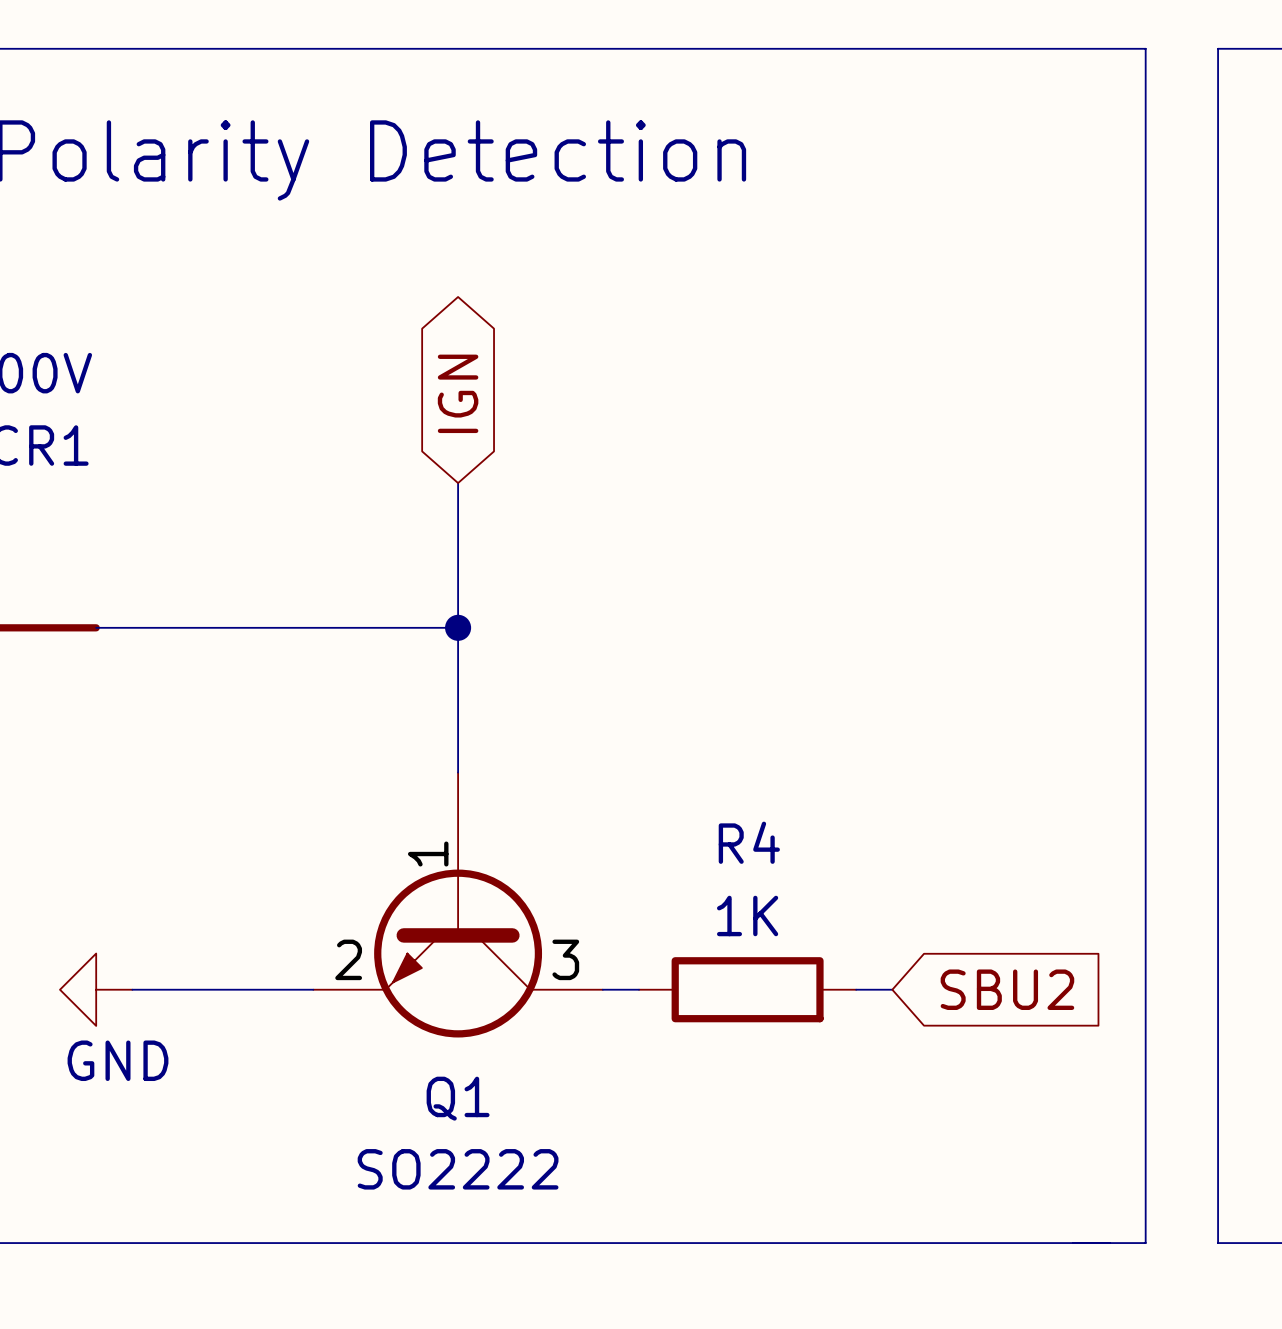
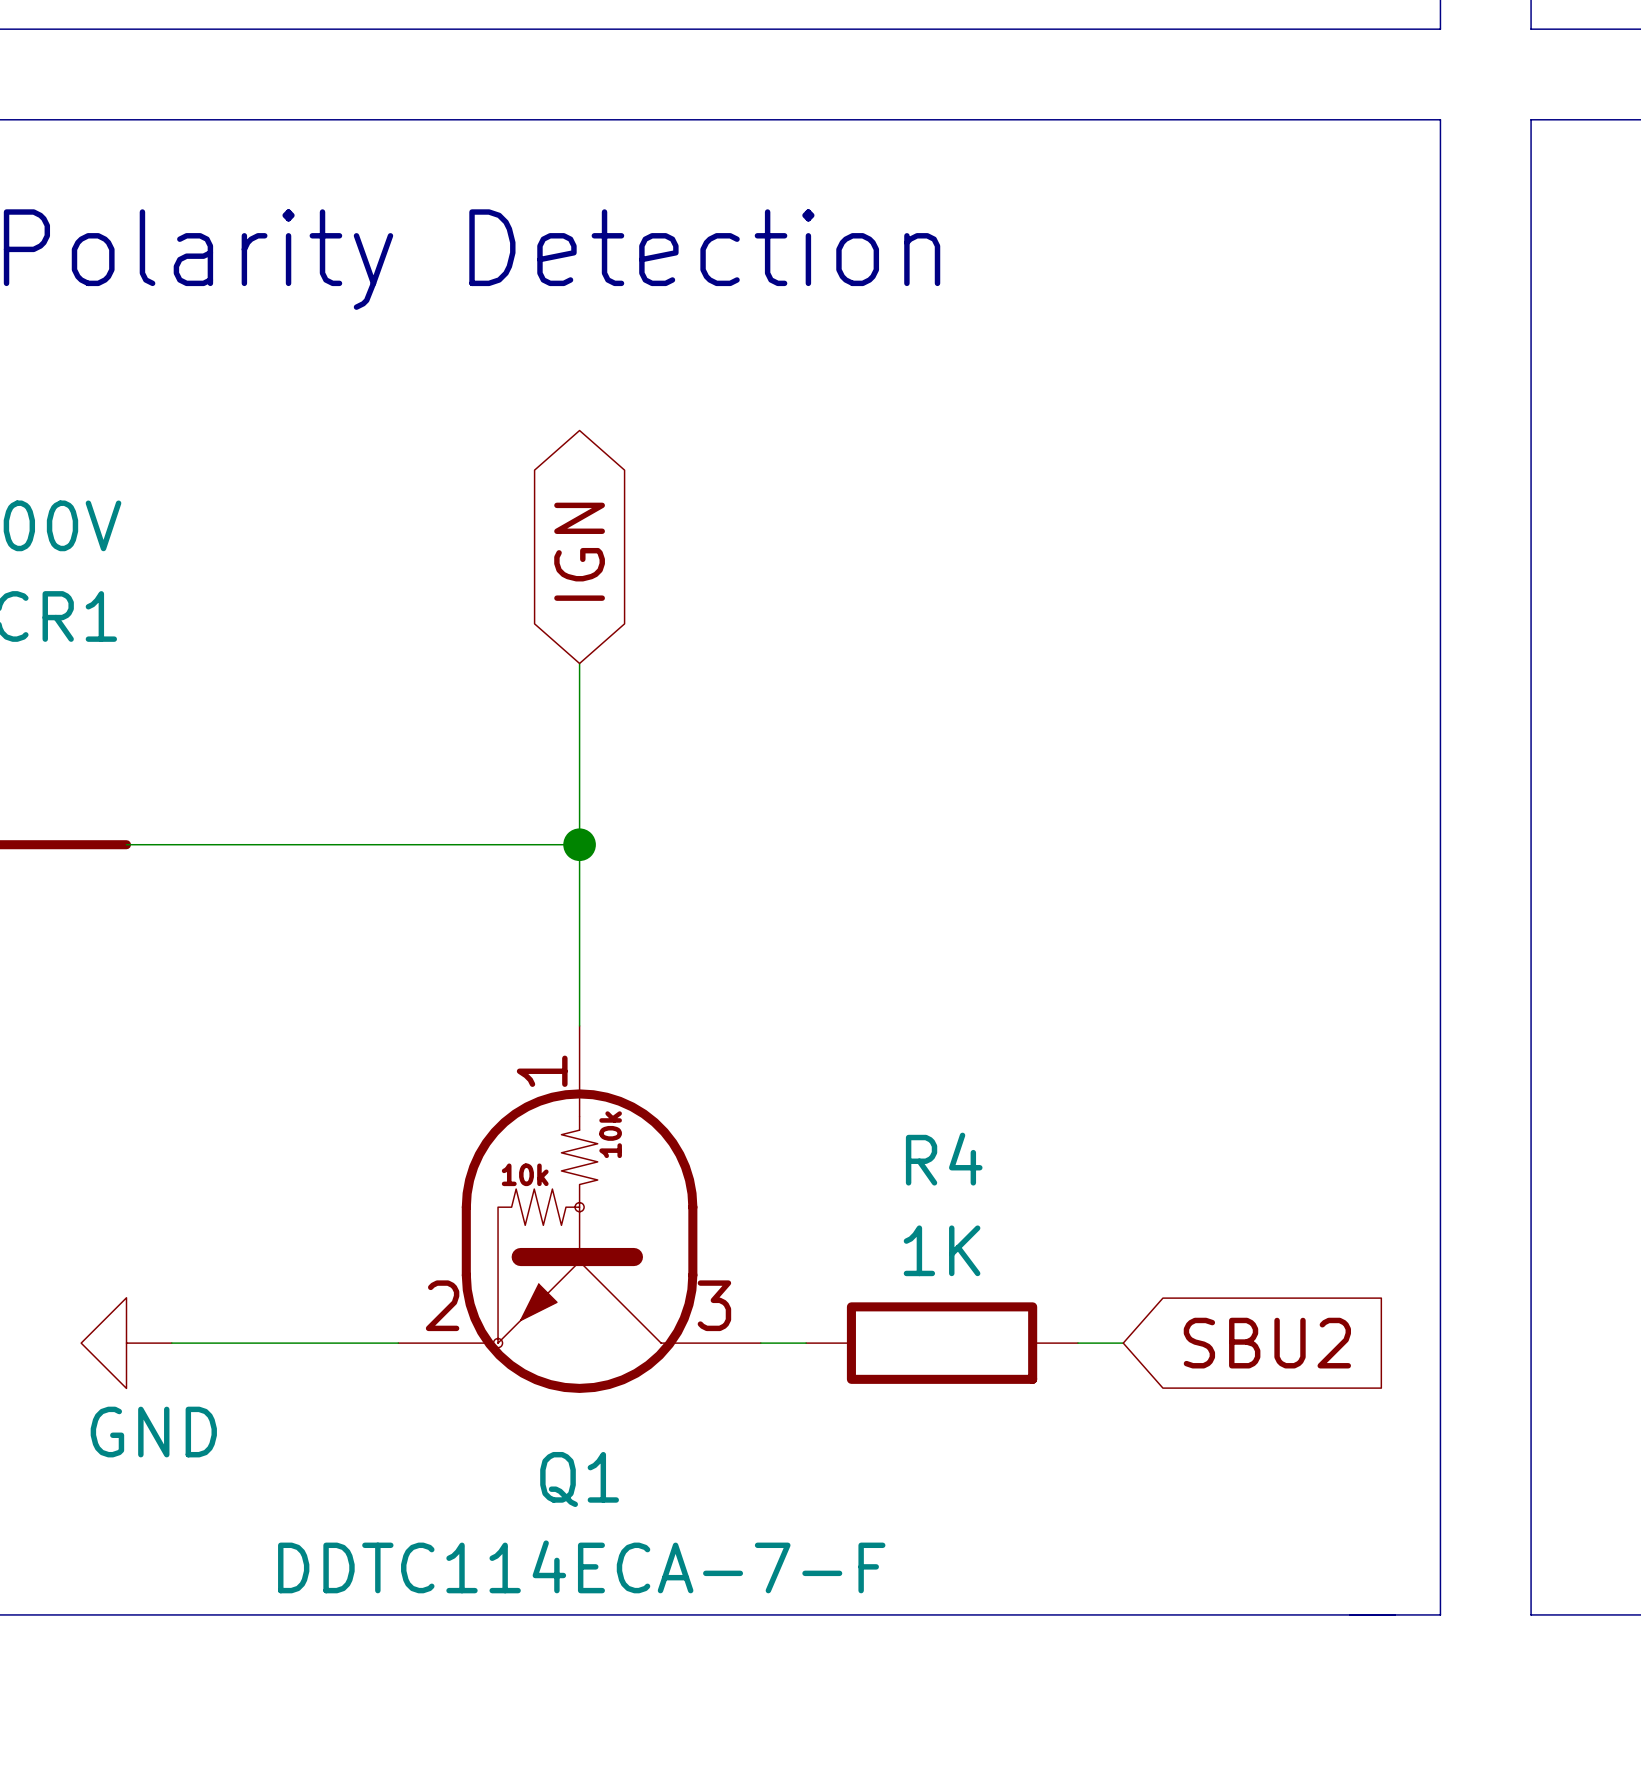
Q1 symbol: [313, 772, 603, 1038] -> [398, 1025, 761, 1393]
power symbol position: GND (96, 989) -> GND (126, 1343)
wire: (132, 989) (313, 989) -> (171, 1343) (398, 1343)
wire: (602, 989) (639, 989) -> (760, 1343) (806, 1343)
R4 position: (747, 989) -> (942, 1343)
wire: (856, 989) (892, 989) -> (1077, 1343) (1123, 1343)
global label position: SBU2 (1007, 989) -> SBU2 (1267, 1343)
Q1 value: SO2222 (458, 1169) -> DDTC114ECA-7-F (581, 1566)

